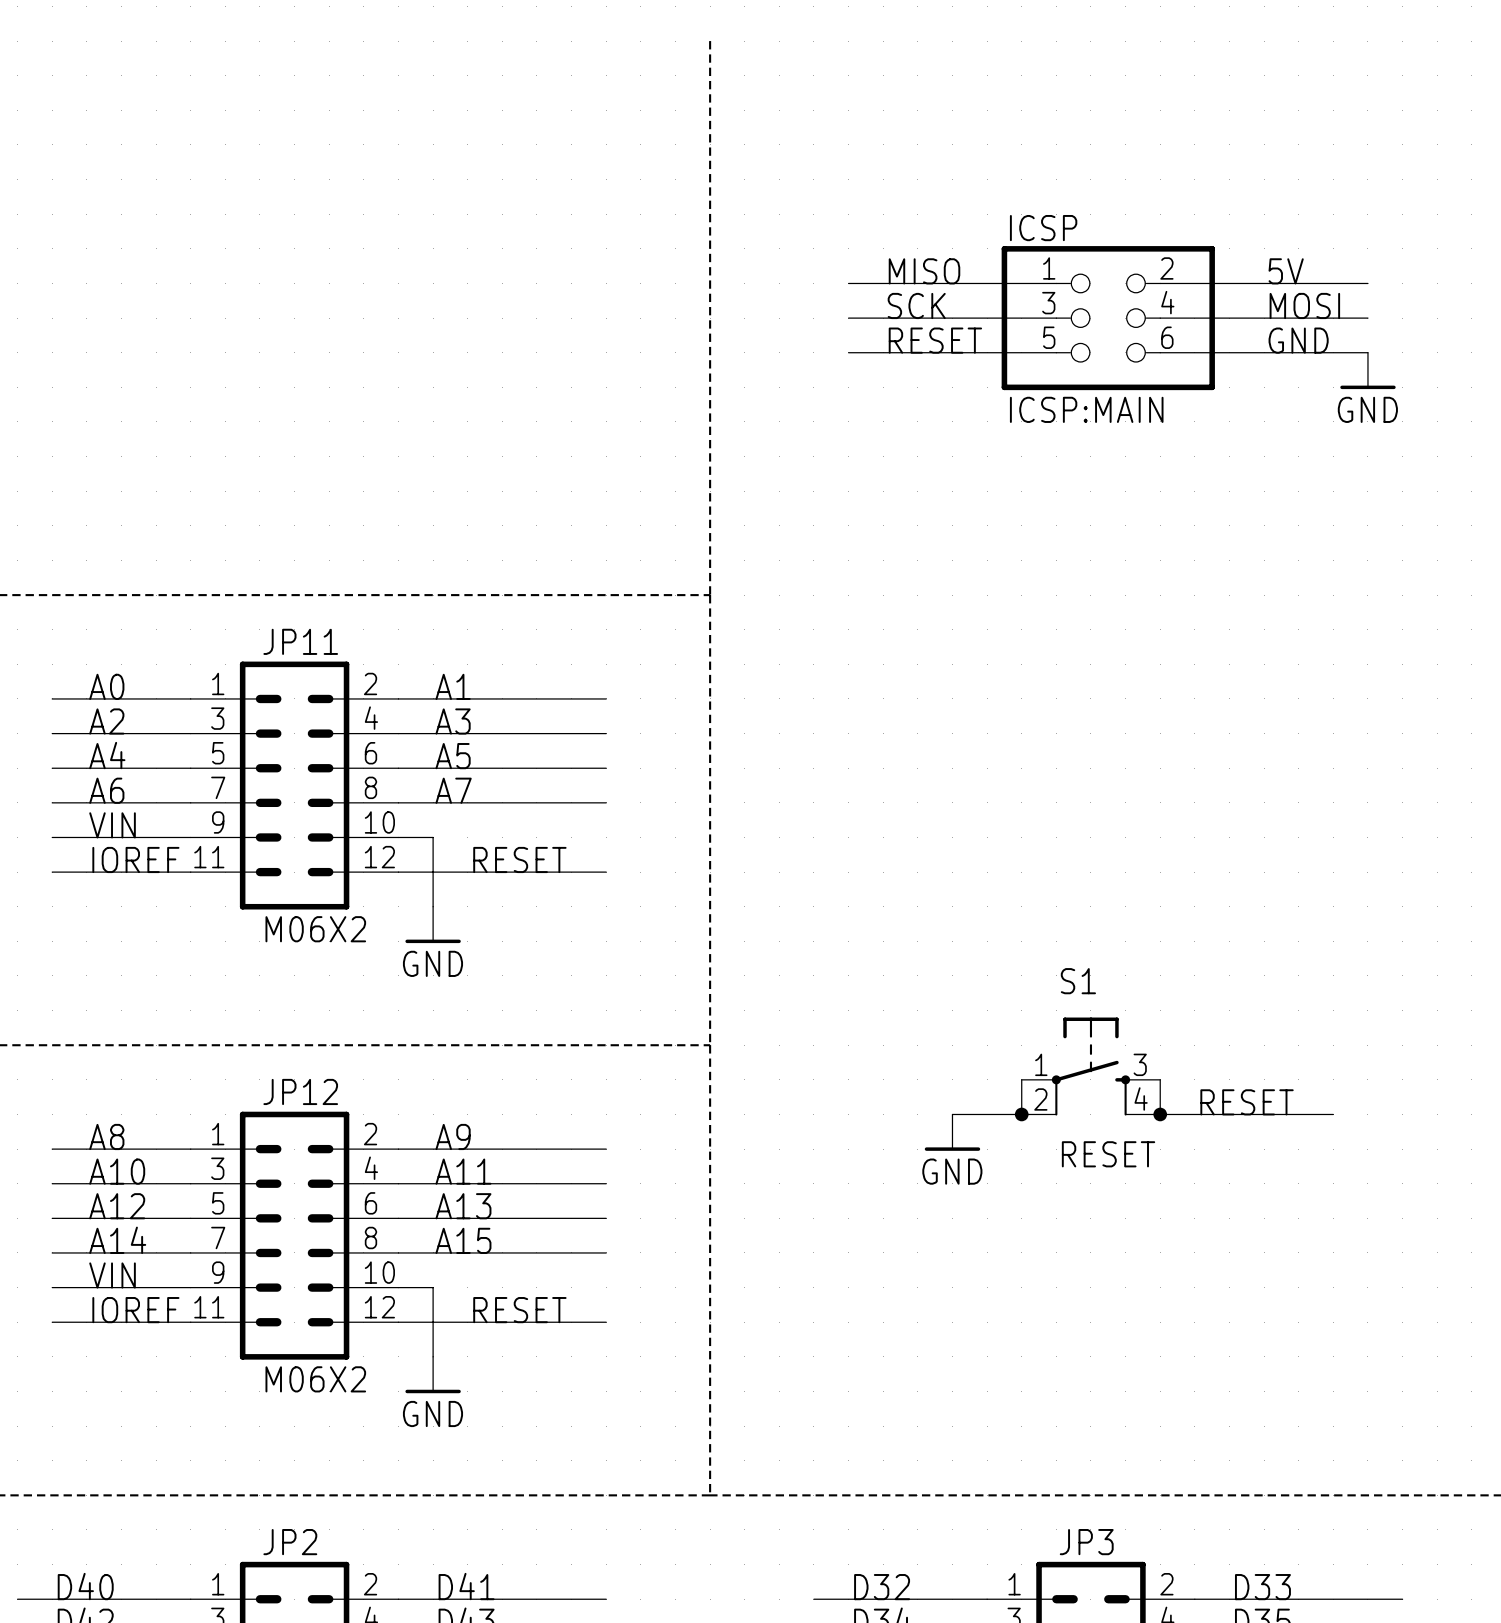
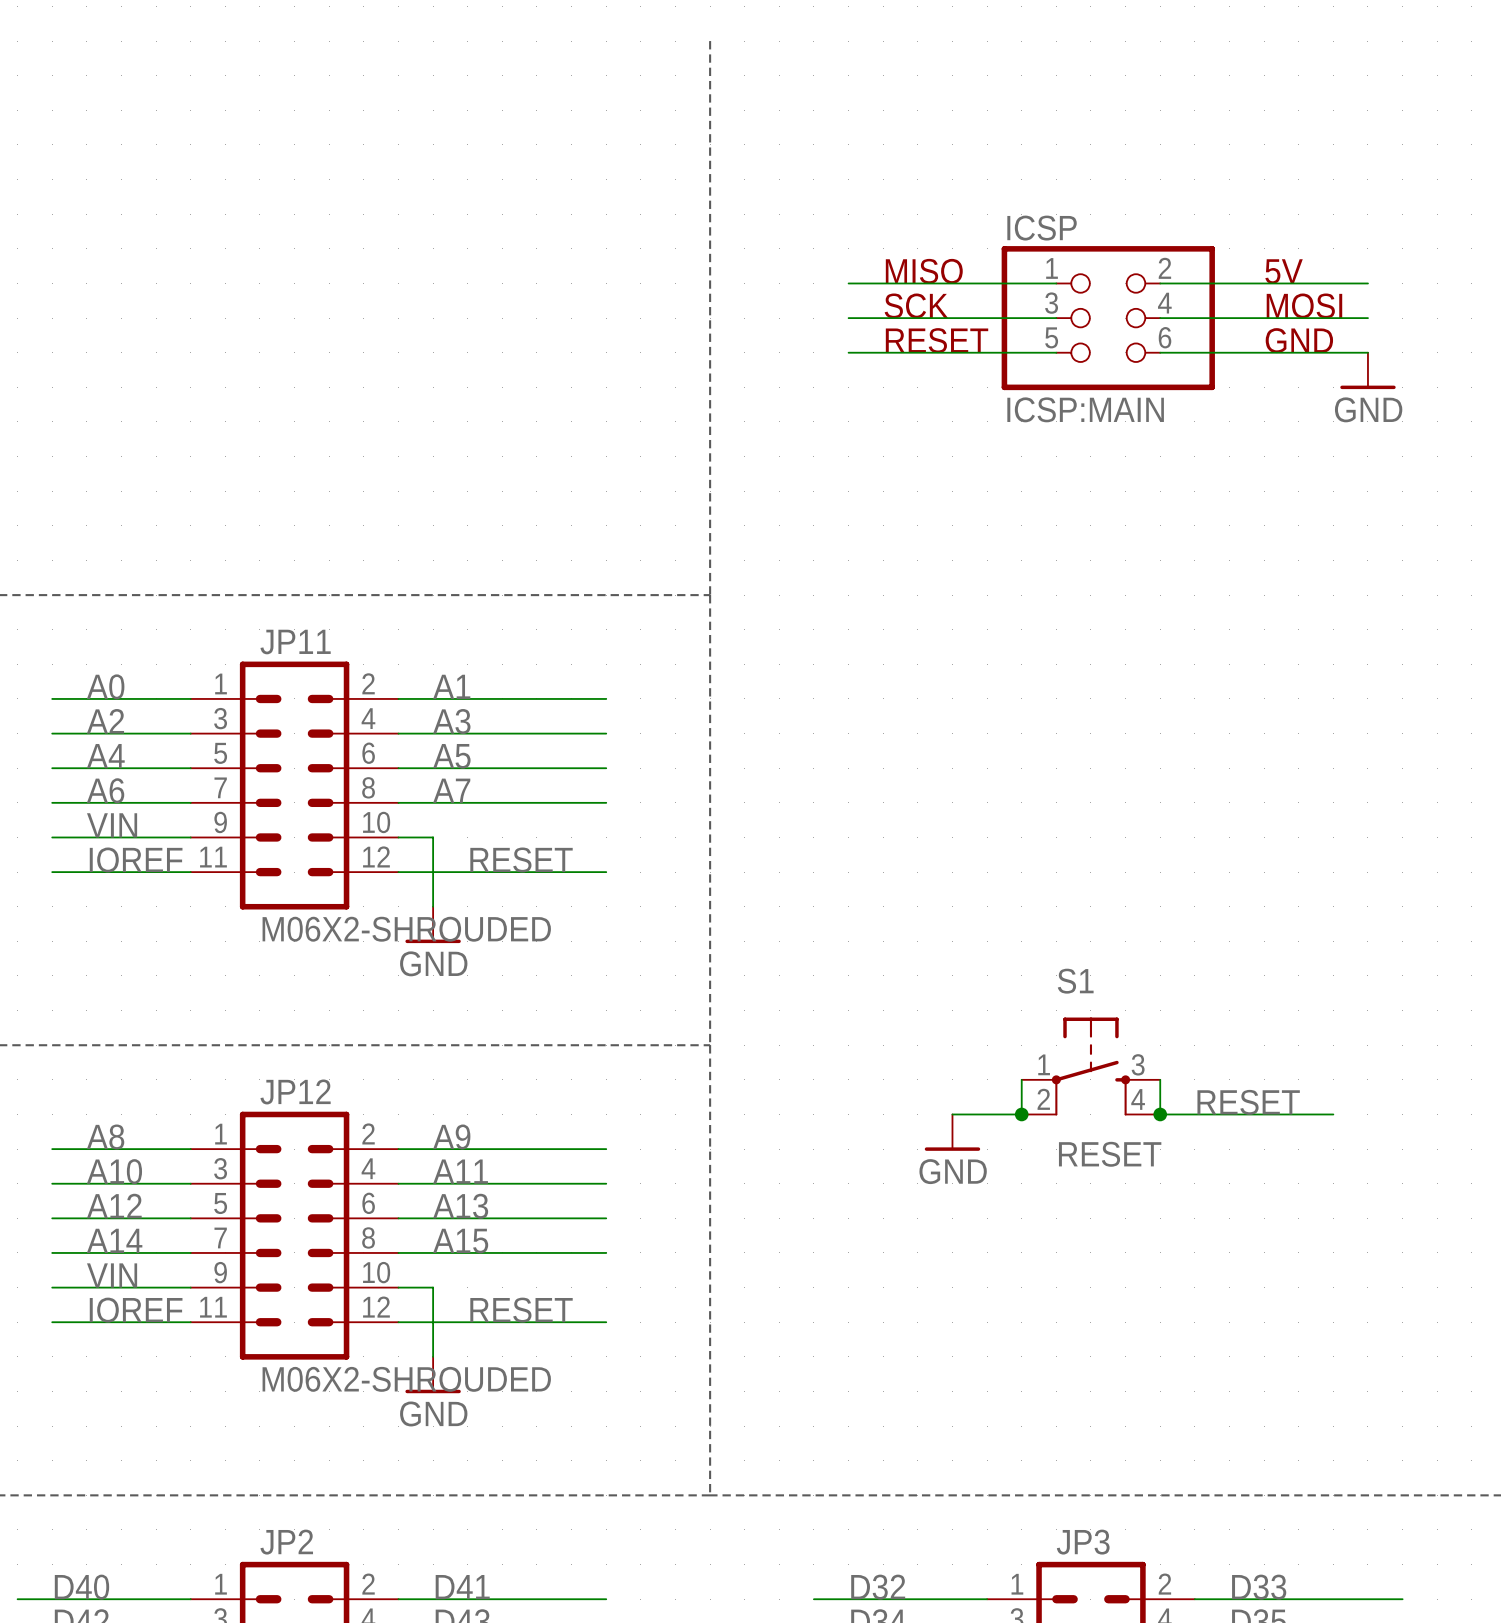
JP11 value: M06X2 (315, 929) -> M06X2-SHROUDED (406, 929)
JP12 value: M06X2 (315, 1379) -> M06X2-SHROUDED (406, 1379)

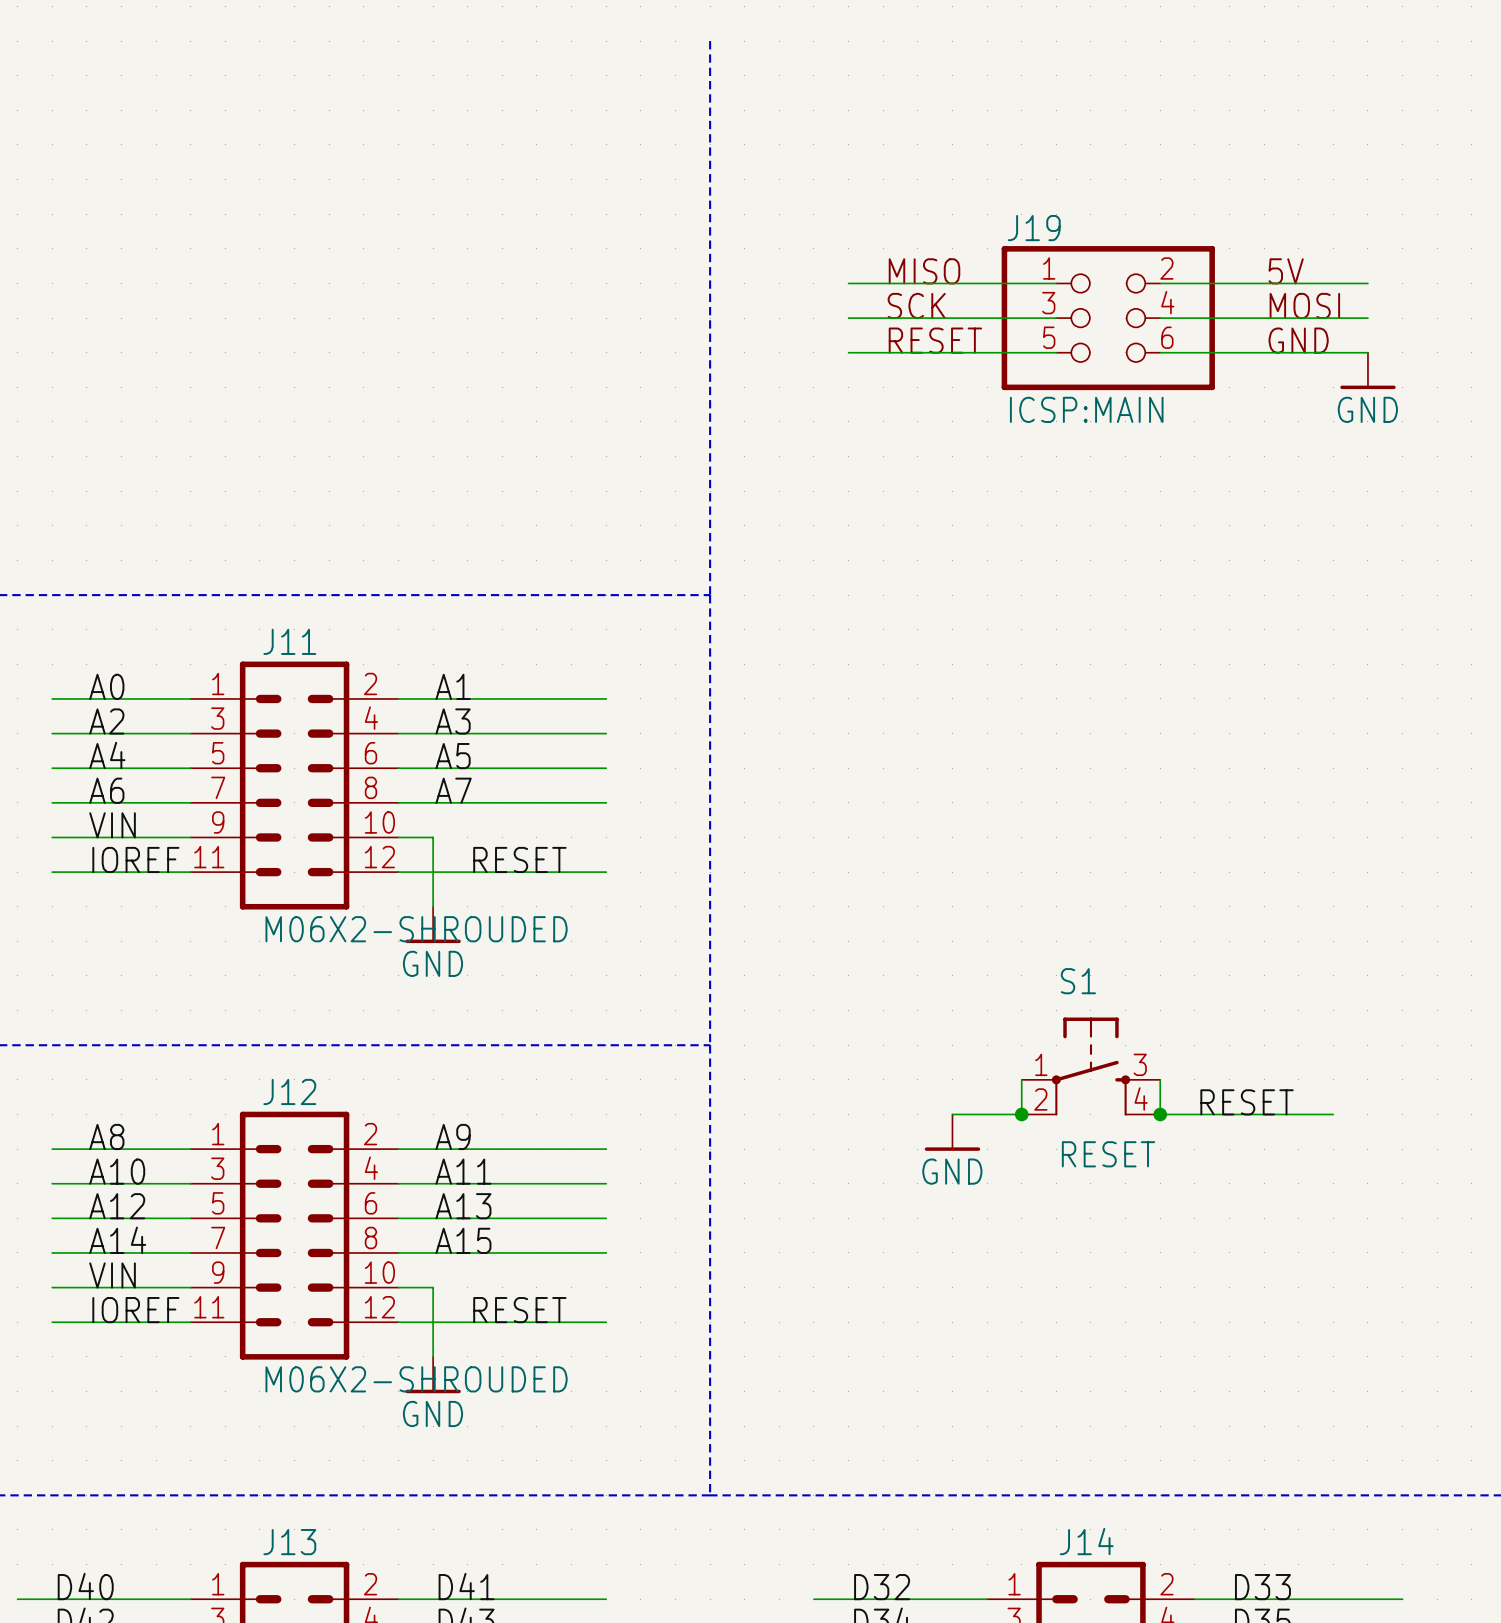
ICSP name: ICSP (1042, 228) -> J19 (1034, 228)
JP11 name: JP11 (295, 642) -> J11 (289, 641)
JP12 name: JP12 (295, 1091) -> J12 (289, 1091)
JP2 name: JP2 (286, 1542) -> J13 (289, 1542)
JP3 name: JP3 (1083, 1542) -> J14 (1086, 1541)

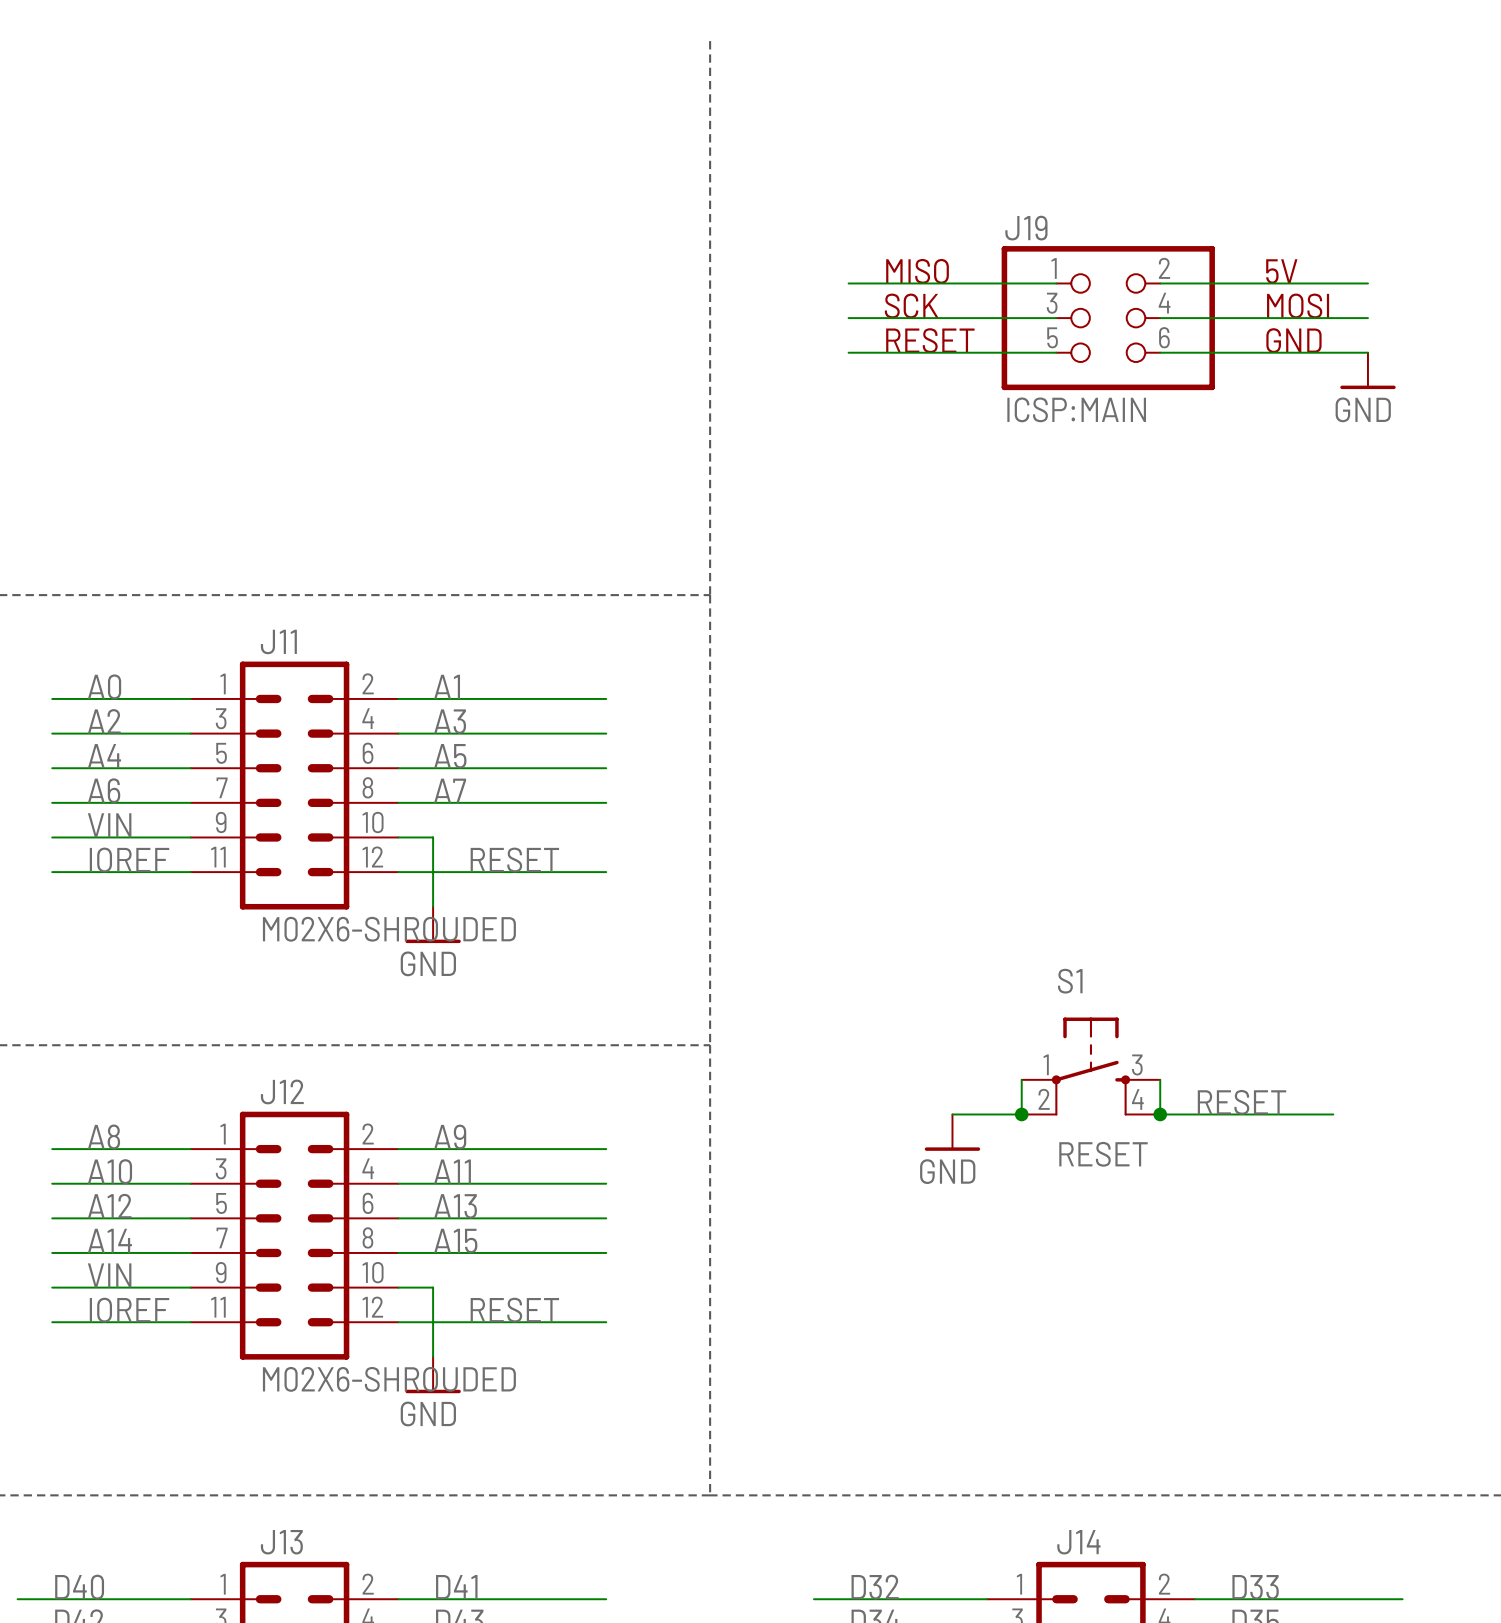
J11 value: M06X2-SHROUDED (416, 929) -> M02X6-SHROUDED (389, 929)
J12 value: M06X2-SHROUDED (416, 1379) -> M02X6-SHROUDED (389, 1379)

